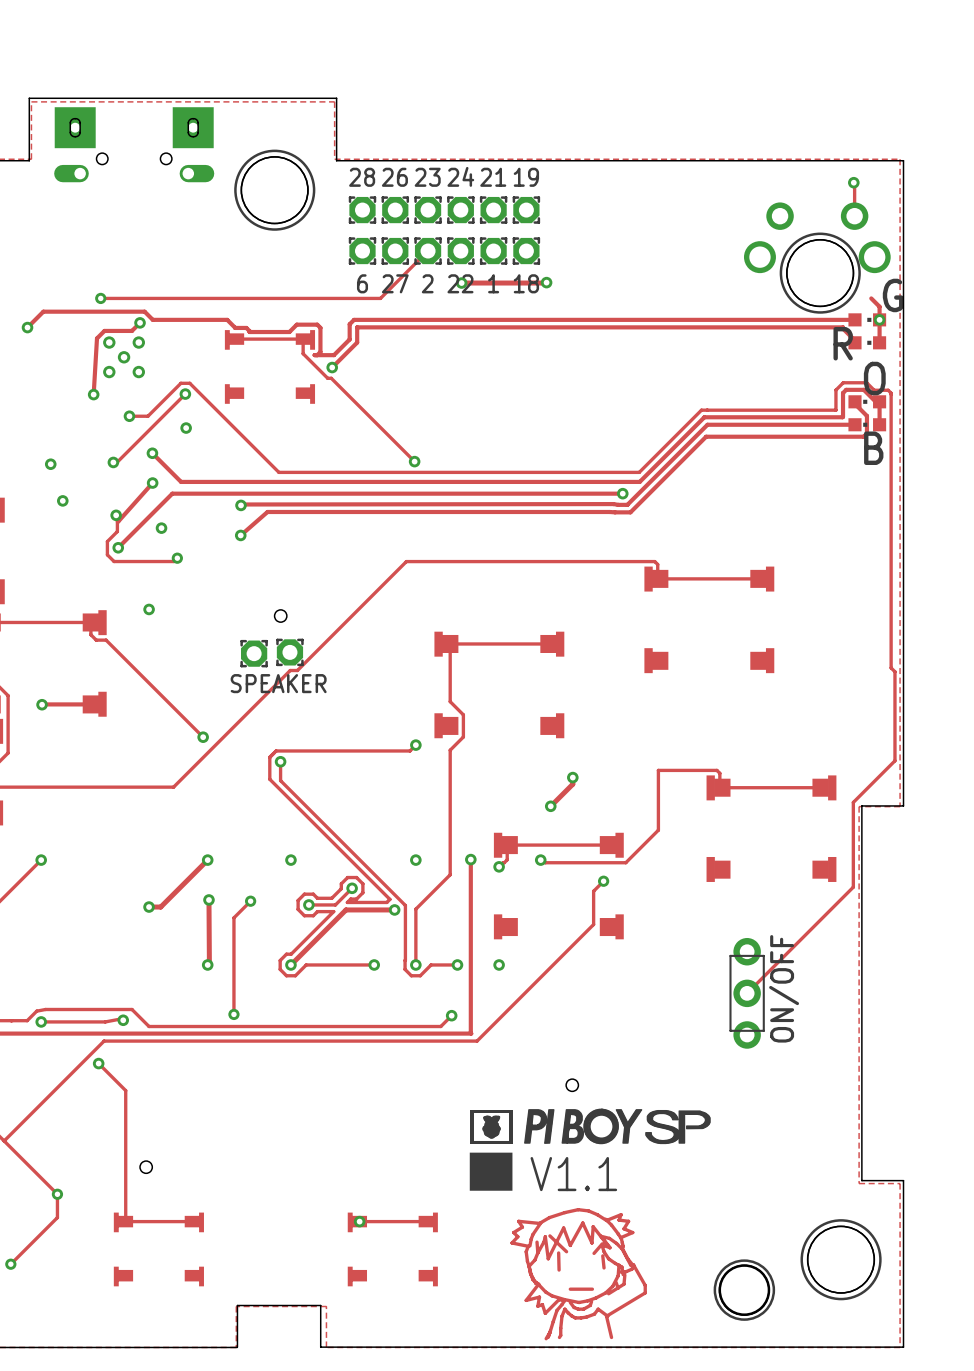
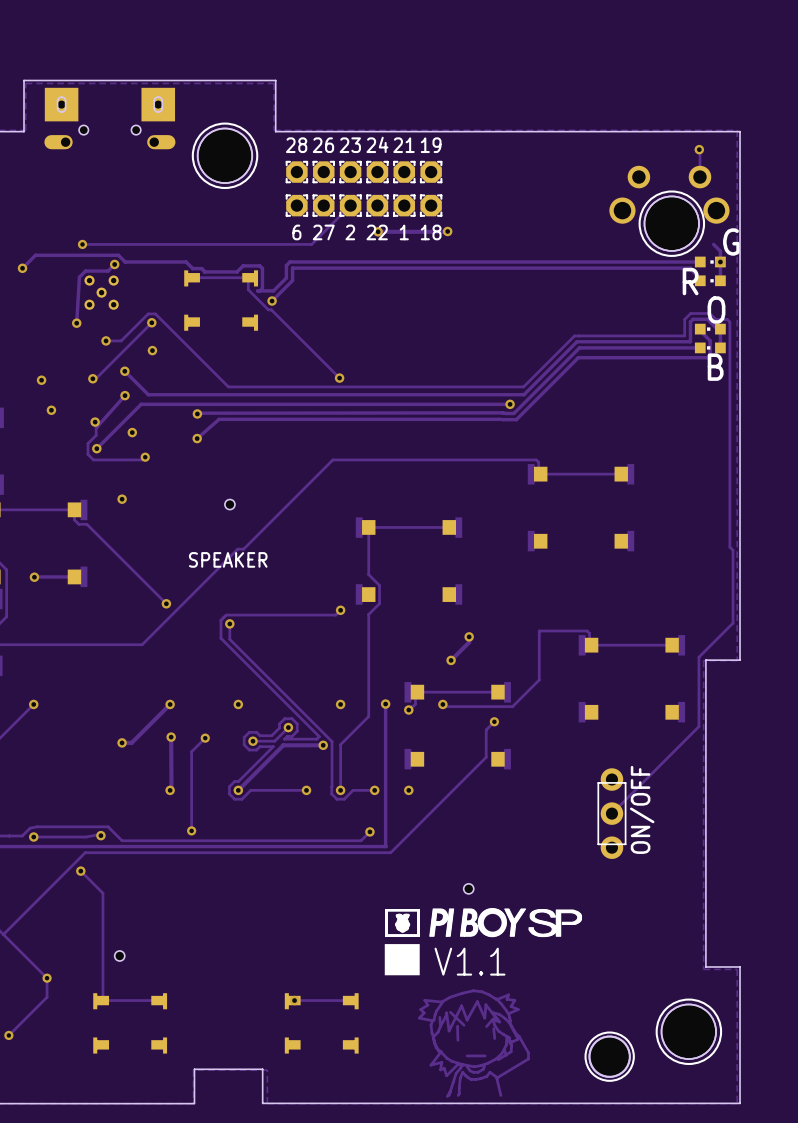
part: (289, 652) -> none
part: (254, 653) -> none

